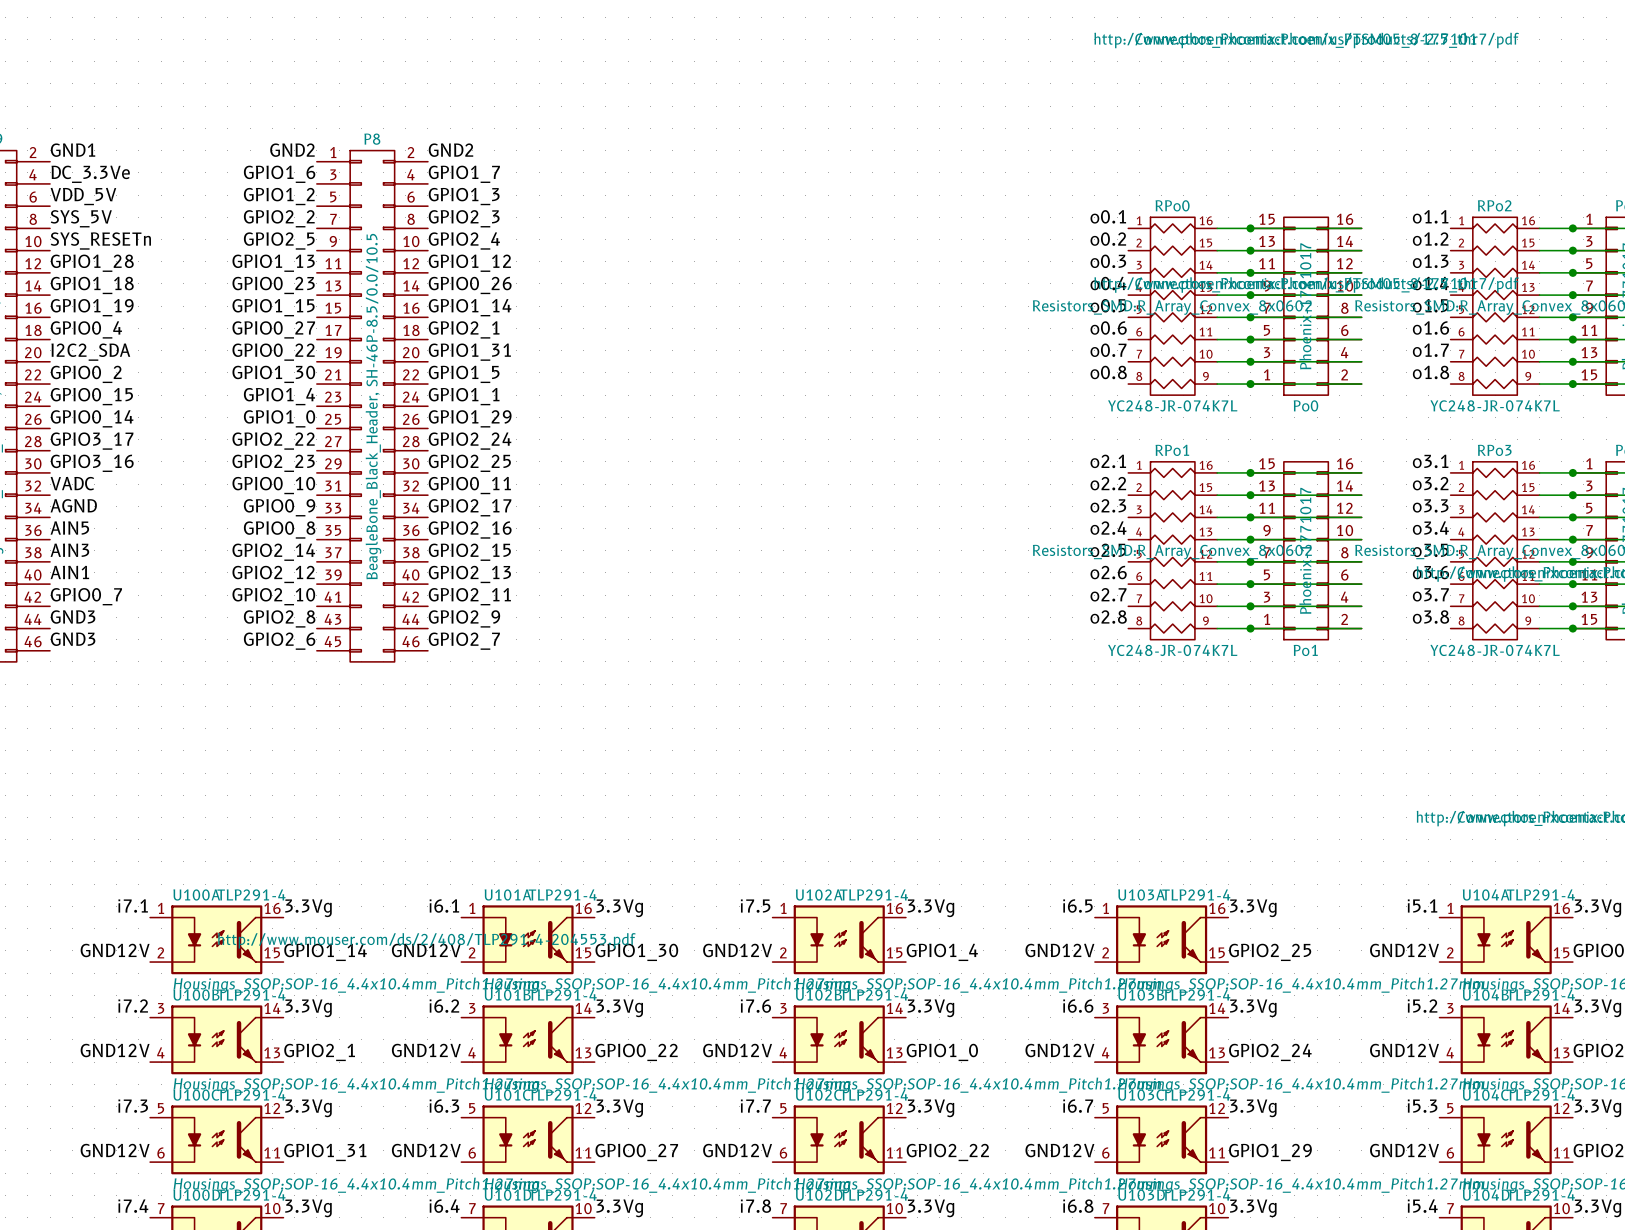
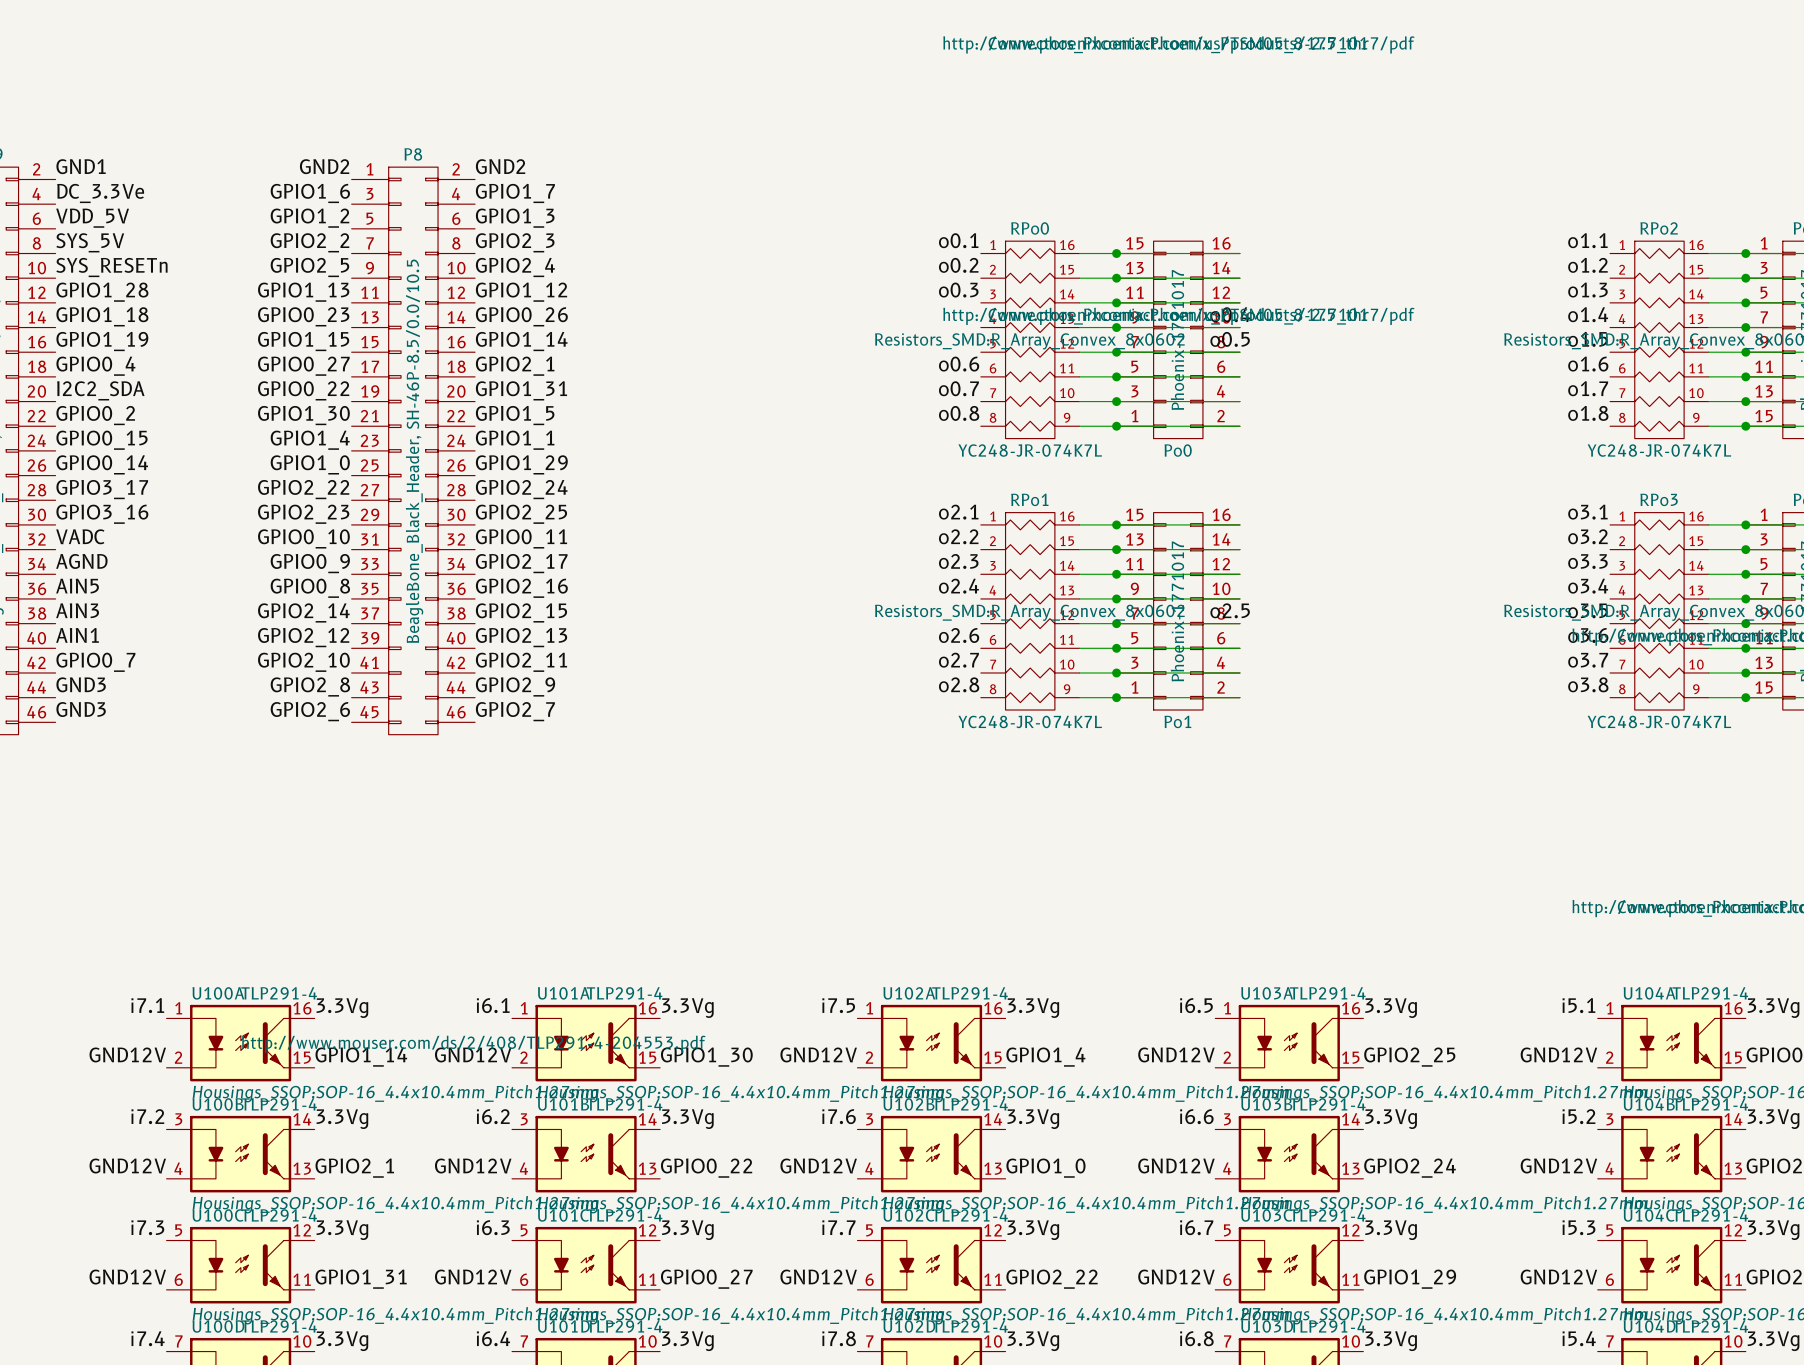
label: none -> o0.1 (958, 240)
label: o0.1 (1108, 216) -> none
wire: none -> (1079, 253) (1239, 253)
junction: none -> (1116, 253)
wire: (1217, 228) (1361, 228) -> none
junction: (1250, 228) -> none
label: none -> o0.2 (958, 265)
label: o0.2 (1108, 239) -> none
wire: none -> (1079, 278) (1239, 278)
junction: none -> (1116, 278)
wire: (1217, 250) (1361, 250) -> none
junction: (1250, 250) -> none
label: none -> o0.3 (958, 290)
label: o0.3 (1108, 261) -> none
wire: none -> (1079, 302) (1239, 302)
junction: none -> (1116, 302)
wire: (1217, 272) (1361, 272) -> none
junction: (1250, 272) -> none
wire: none -> (1079, 327) (1239, 327)
junction: none -> (1116, 327)
wire: (1217, 295) (1361, 295) -> none
junction: (1250, 295) -> none
RPo0 position: (1172, 306) -> (1030, 339)
Po0 position: (1306, 306) -> (1178, 339)
wire: none -> (1079, 352) (1239, 352)
junction: none -> (1116, 352)
wire: (1217, 317) (1361, 317) -> none
junction: (1250, 317) -> none
label: none -> o0.6 (959, 364)
label: o0.6 (1108, 328) -> none
wire: none -> (1079, 376) (1239, 376)
junction: none -> (1116, 376)
wire: (1217, 339) (1361, 339) -> none
junction: (1250, 339) -> none
label: none -> o0.7 (958, 388)
label: o0.7 (1108, 350) -> none
wire: none -> (1079, 401) (1239, 401)
junction: none -> (1116, 401)
wire: (1217, 361) (1361, 361) -> none
junction: (1250, 361) -> none
label: none -> o0.8 (959, 413)
label: o0.8 (1108, 372) -> none
wire: none -> (1079, 426) (1239, 426)
junction: none -> (1116, 426)
wire: (1217, 384) (1361, 384) -> none
junction: (1250, 384) -> none
label: none -> o2.1 (958, 512)
label: o2.1 (1108, 461) -> none
wire: none -> (1079, 524) (1239, 524)
junction: none -> (1116, 524)
wire: (1217, 472) (1361, 472) -> none
junction: (1250, 472) -> none
label: none -> o2.2 (958, 536)
label: o2.2 (1108, 483) -> none
wire: none -> (1079, 549) (1239, 549)
junction: none -> (1116, 549)
wire: (1217, 495) (1361, 495) -> none
junction: (1250, 495) -> none
label: none -> o2.3 (958, 561)
label: o2.3 (1108, 505) -> none
wire: none -> (1079, 574) (1239, 574)
junction: none -> (1116, 574)
wire: (1217, 517) (1361, 517) -> none
junction: (1250, 517) -> none
label: none -> o2.4 (958, 586)
label: o2.4 (1108, 528) -> none
wire: none -> (1079, 598) (1239, 598)
junction: none -> (1116, 598)
wire: (1217, 539) (1361, 539) -> none
junction: (1250, 539) -> none
RPo1 position: (1172, 550) -> (1030, 611)
Po1 position: (1306, 550) -> (1178, 611)
wire: none -> (1079, 623) (1239, 623)
junction: none -> (1116, 623)
wire: (1217, 561) (1361, 561) -> none
junction: (1250, 561) -> none
label: none -> o2.6 (959, 635)
label: o2.6 (1108, 572) -> none
wire: none -> (1079, 648) (1239, 648)
junction: none -> (1116, 648)
wire: (1217, 584) (1361, 584) -> none
junction: (1250, 584) -> none
label: none -> o2.7 (958, 660)
label: o2.7 (1108, 594) -> none
wire: none -> (1079, 672) (1239, 672)
junction: none -> (1116, 672)
wire: (1217, 606) (1361, 606) -> none
junction: (1250, 606) -> none
label: none -> o2.8 (959, 684)
label: o2.8 (1108, 617) -> none
wire: none -> (1079, 697) (1239, 697)
junction: none -> (1116, 697)
wire: (1217, 628) (1361, 628) -> none
junction: (1250, 628) -> none

